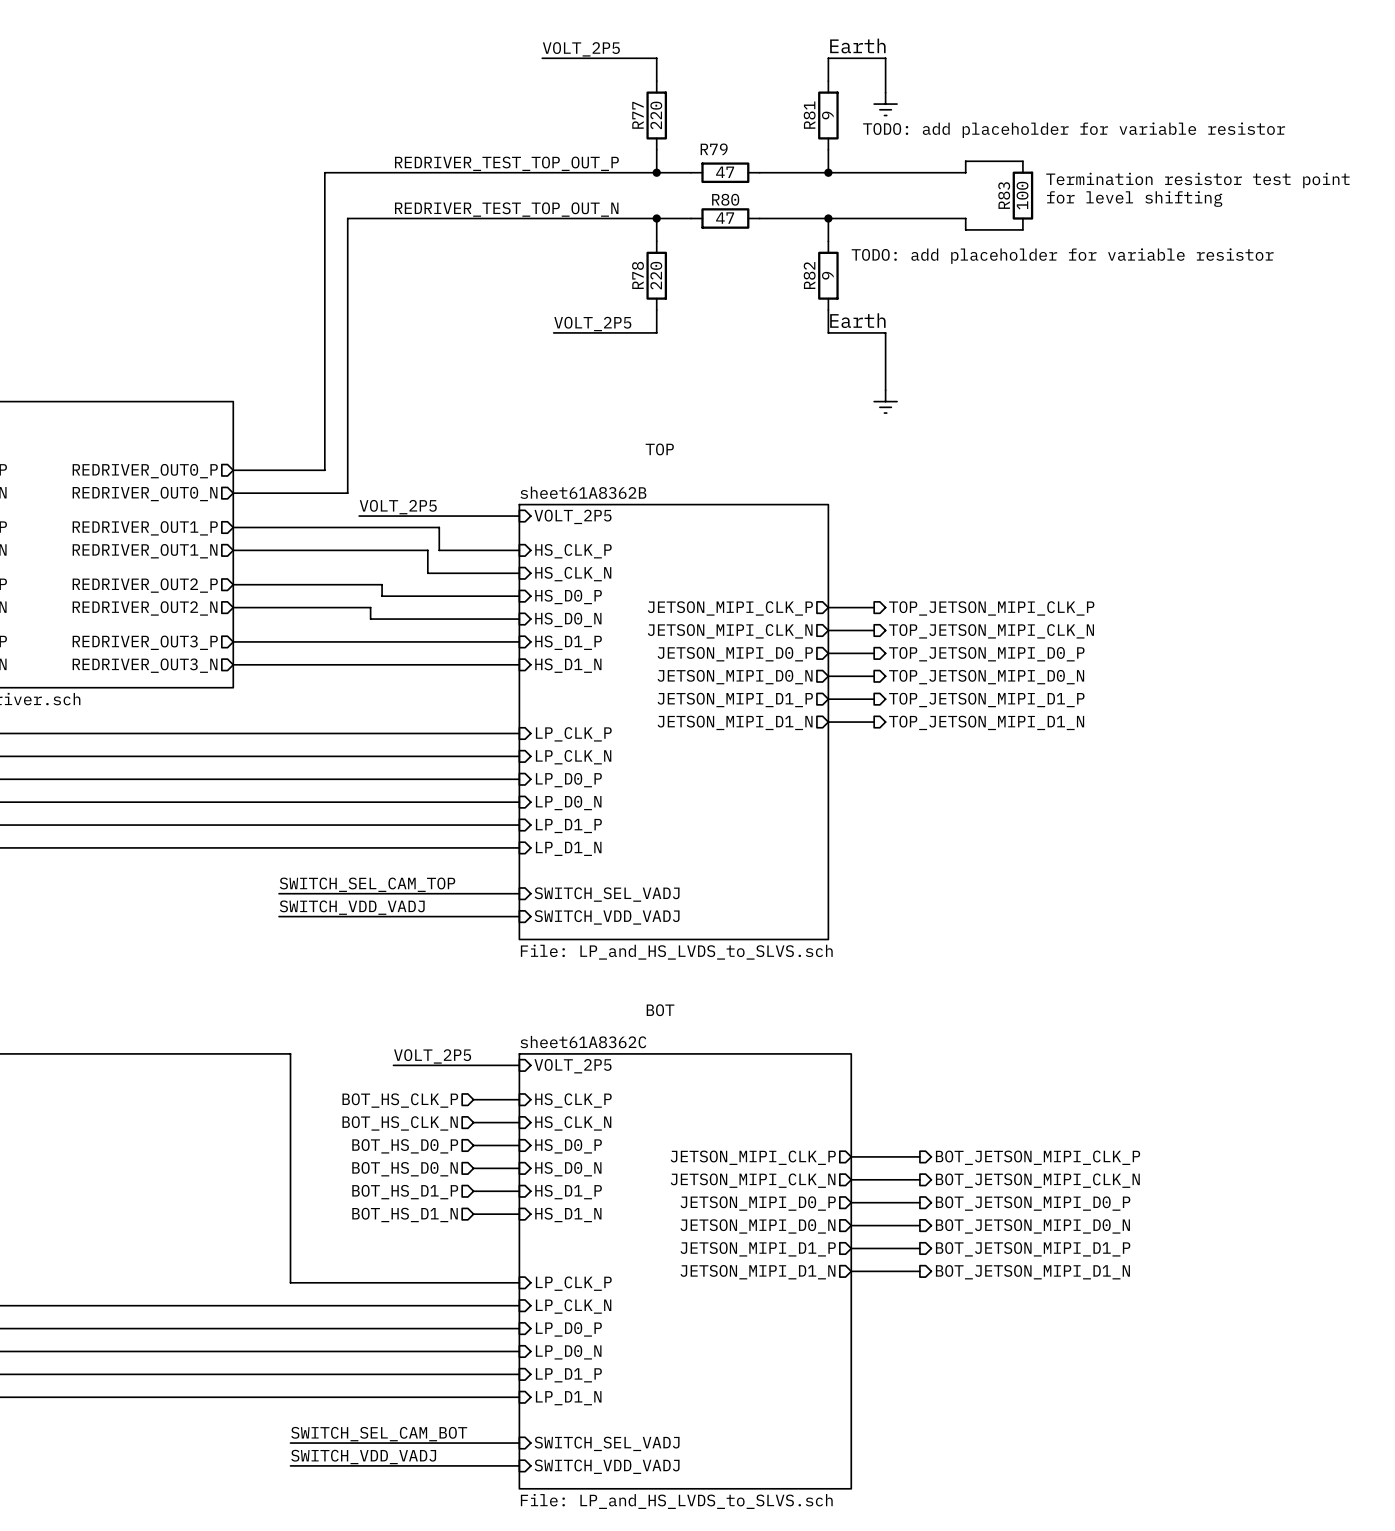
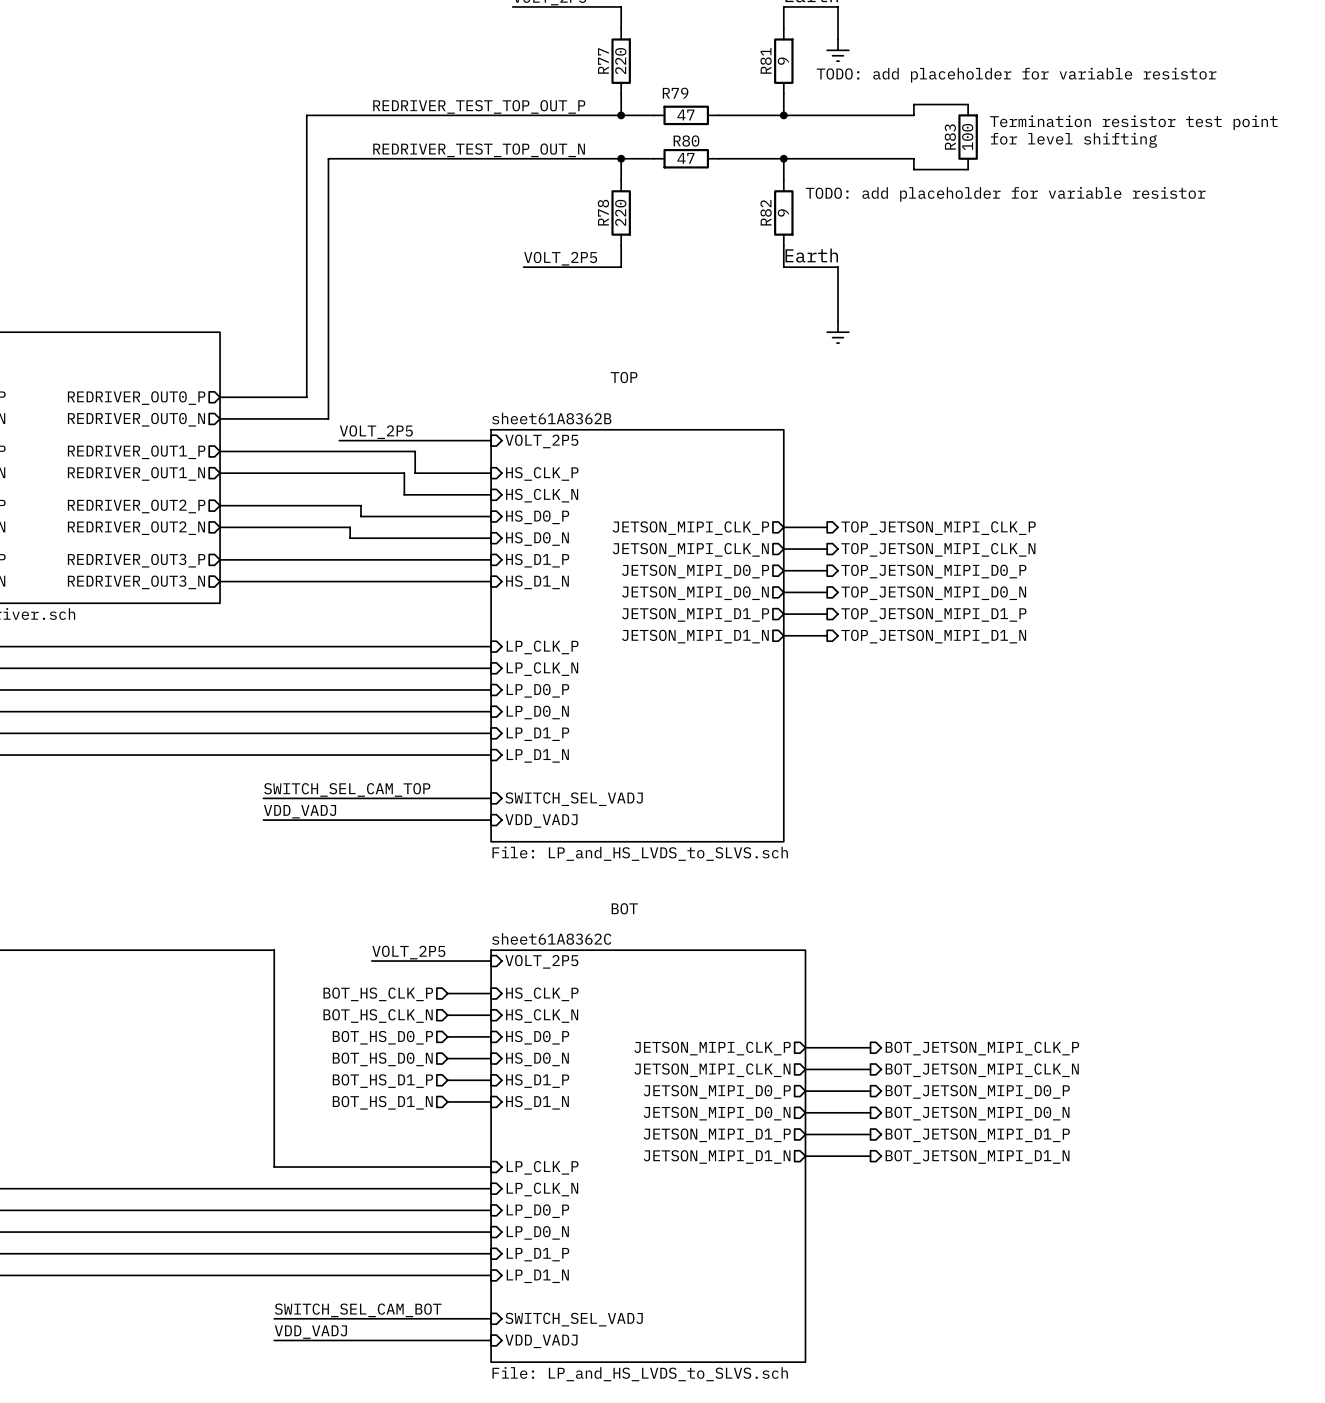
label: SWITCH_VDD_VADJ (352, 907) -> VDD_VADJ (300, 811)
sheet pin: SWITCH_VDD_VADJ (607, 917) -> VDD_VADJ (541, 820)
label: SWITCH_VDD_VADJ (363, 1456) -> VDD_VADJ (310, 1332)
sheet pin: SWITCH_VDD_VADJ (607, 1466) -> VDD_VADJ (541, 1341)

